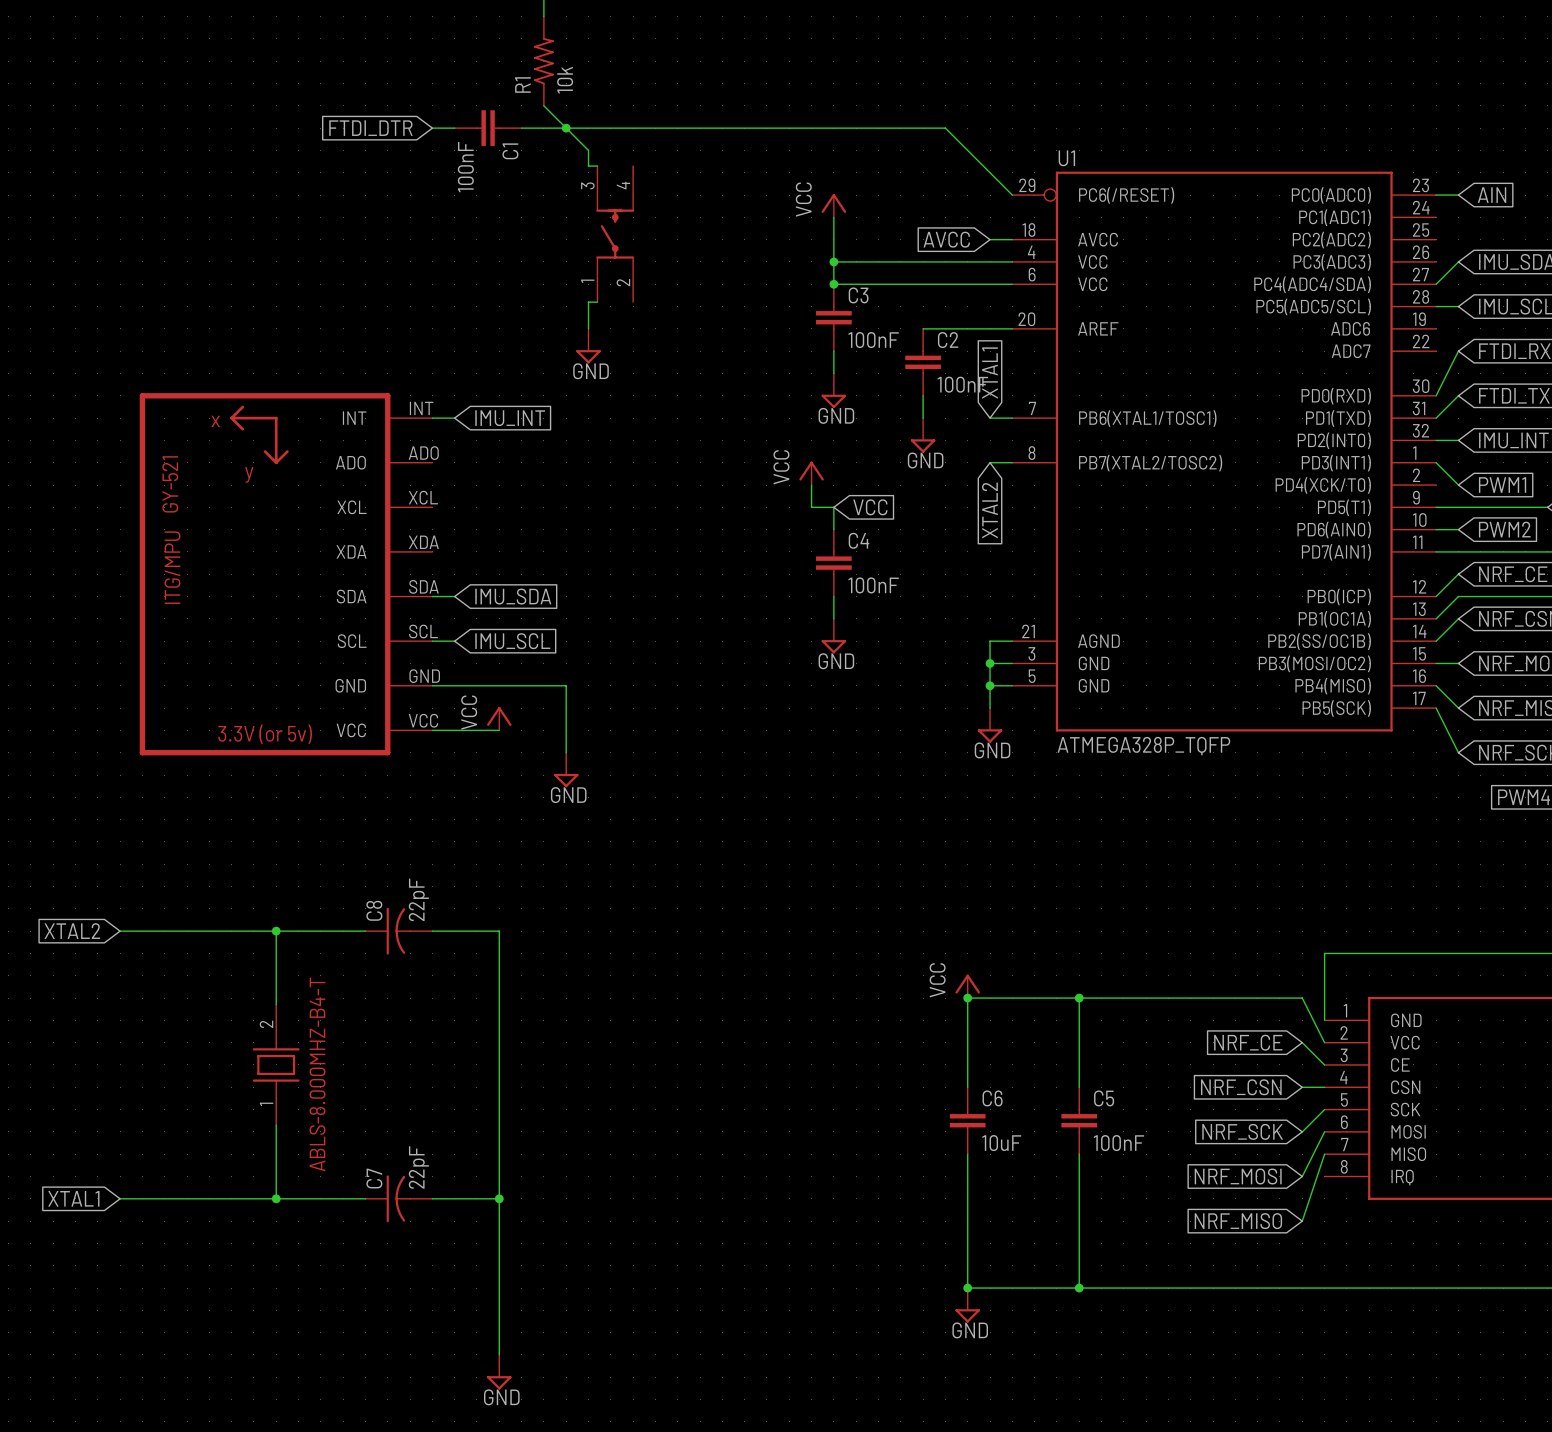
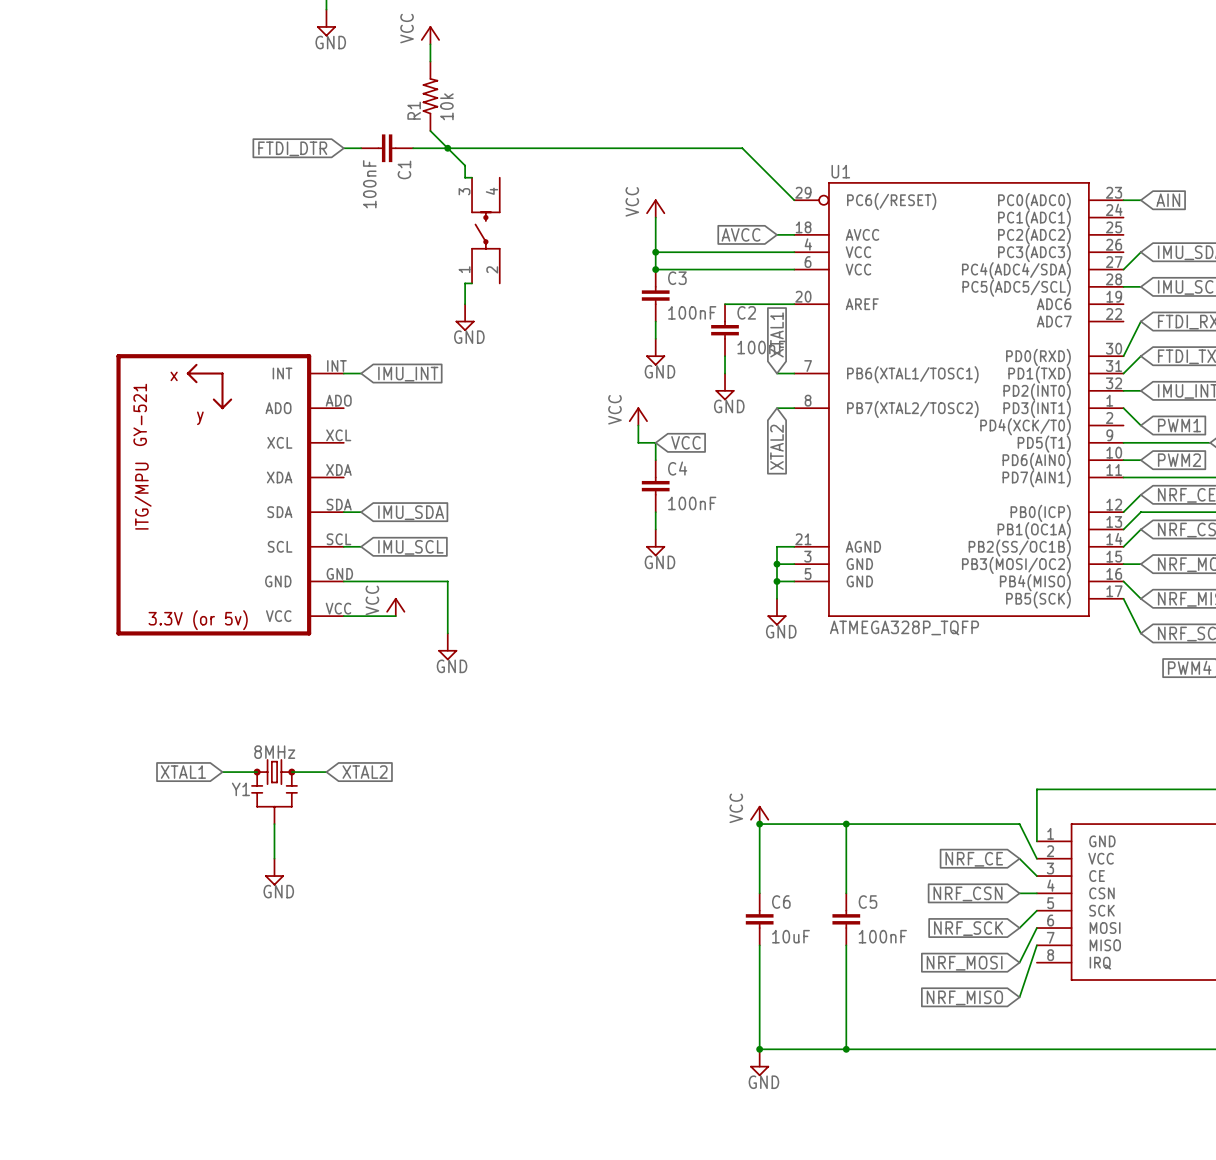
global label: XTAL2 (72, 931) -> none
wire: (120, 931) (276, 931) (276, 1004) -> none
global label: none -> XTAL1 (183, 772)
junction: (276, 931) -> none
C8: 22pF (398, 931) -> none
wire: (432, 931) (499, 931) (499, 1354) -> none
global label: none -> XTAL2 (365, 772)
Y1: none -> 8MHz (274, 791)
wire: none -> (274, 824) (274, 858)
power symbol: none -> GND (274, 872)
part: (276, 1064) -> none
wire: (276, 1125) (276, 1198) -> none
global label: XTAL1 (73, 1198) -> none
wire: (120, 1198) (365, 1198) -> none
junction: (276, 1198) -> none
C7: 22pF (398, 1198) -> none
wire: (432, 1198) (499, 1198) -> none
junction: (499, 1198) -> none
power symbol: GND (499, 1372) -> none

